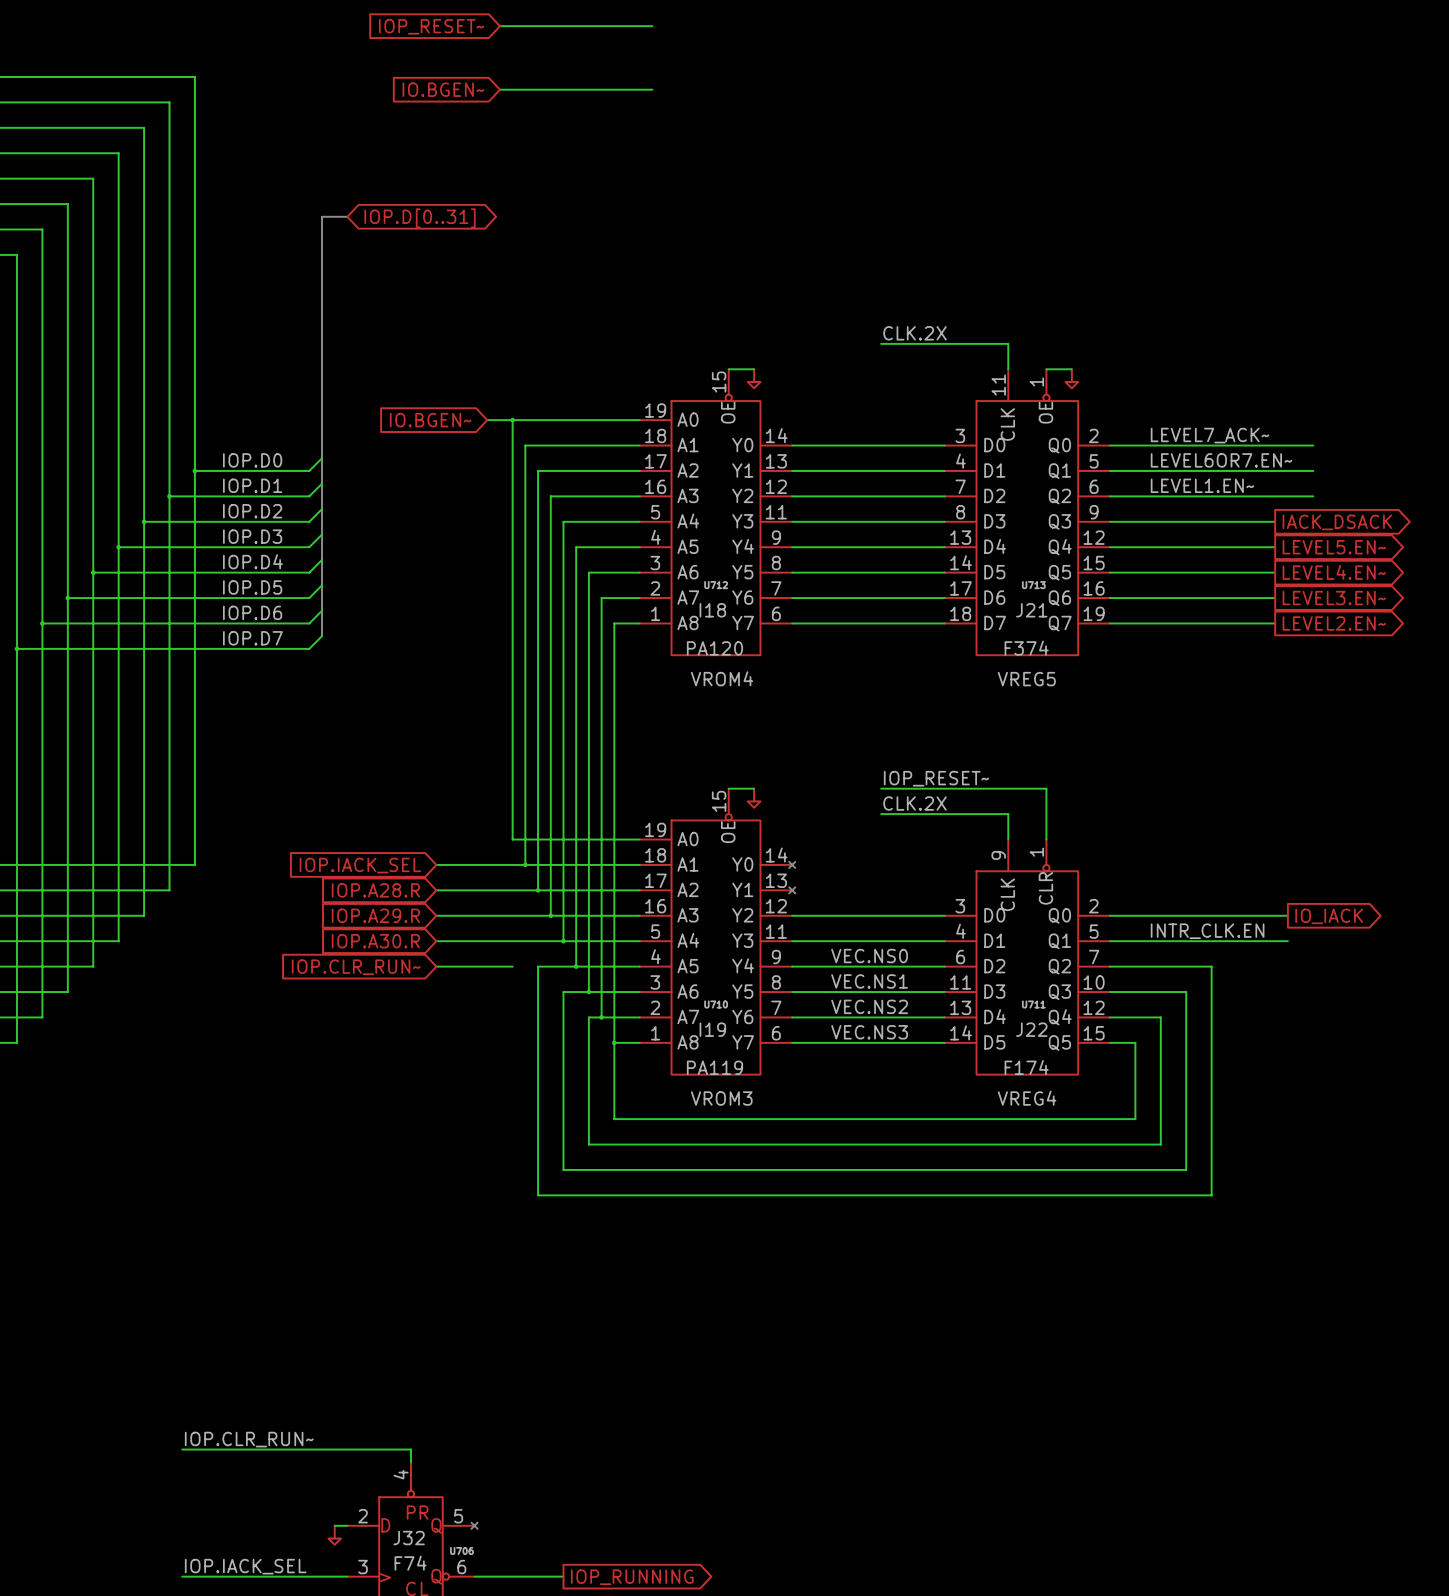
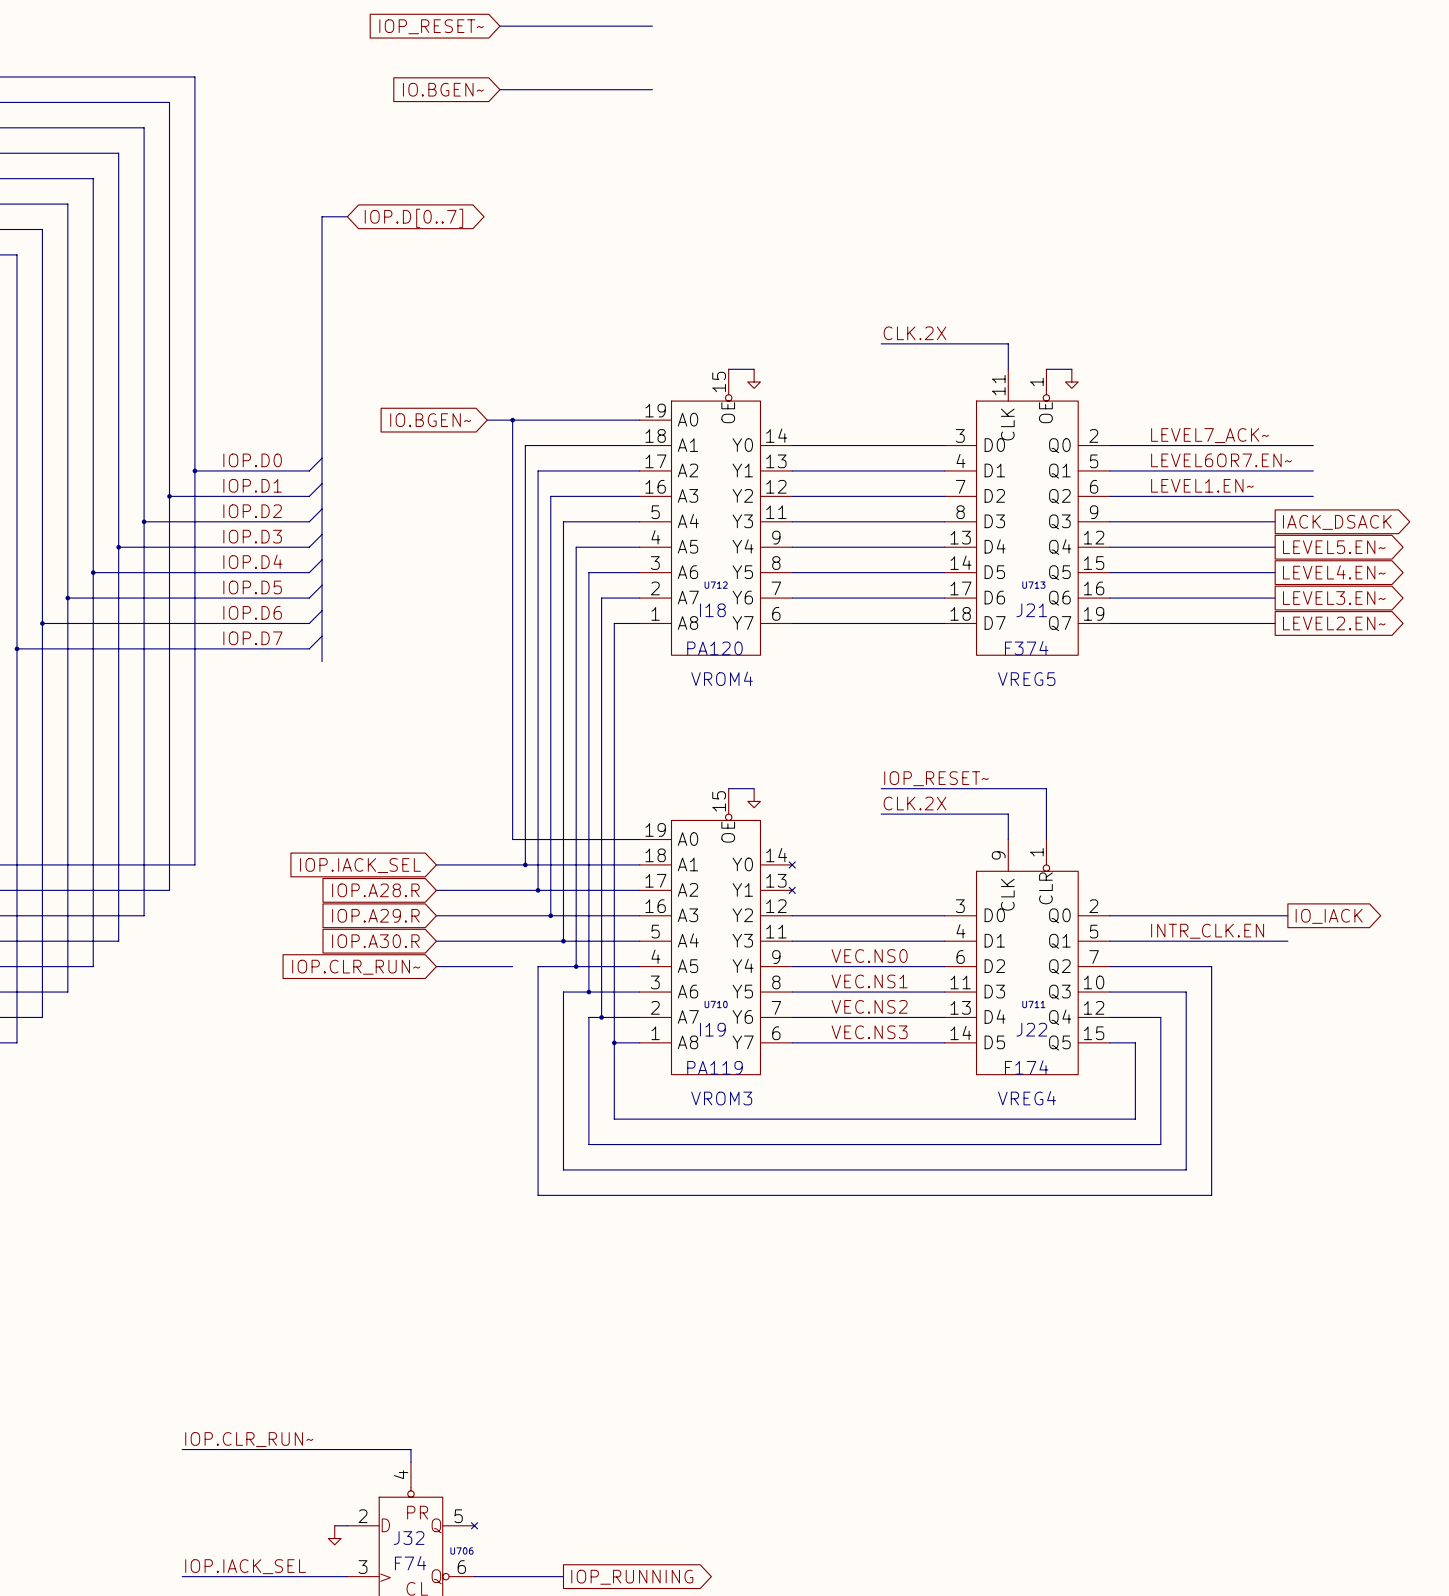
global label: IOP.D[0..31] (420, 218) -> IOP.D[0..7] (413, 218)
bus: none -> (322, 636) (322, 661)

